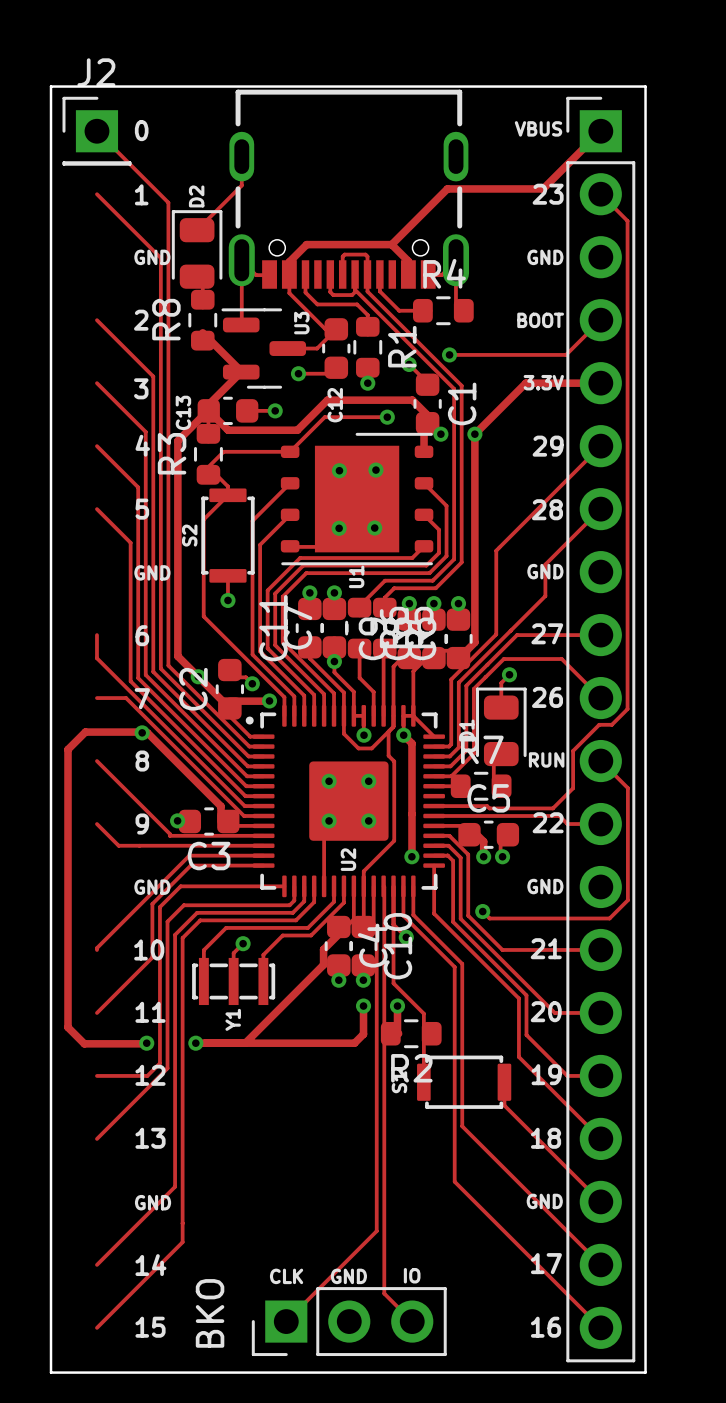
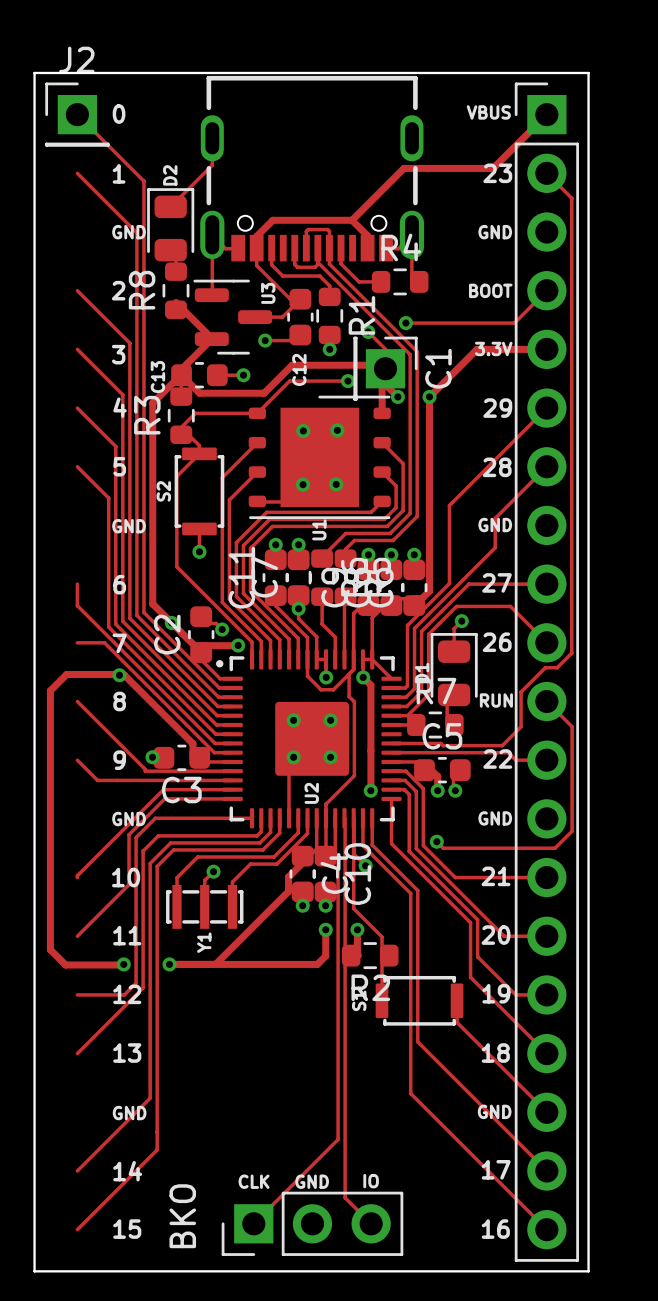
C1 footprint: [413, 373, 442, 435] -> [353, 336, 418, 401]

